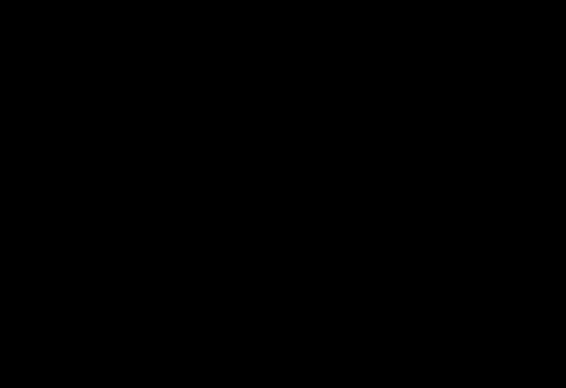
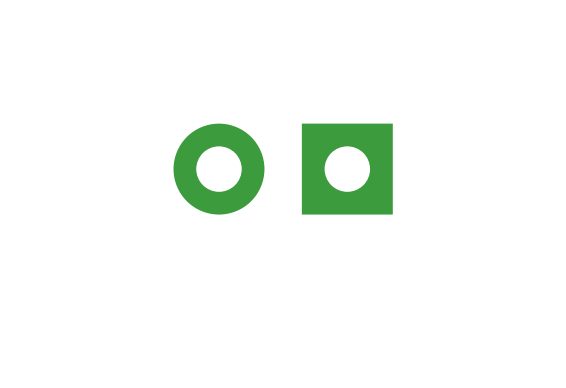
part: none -> (283, 169)

